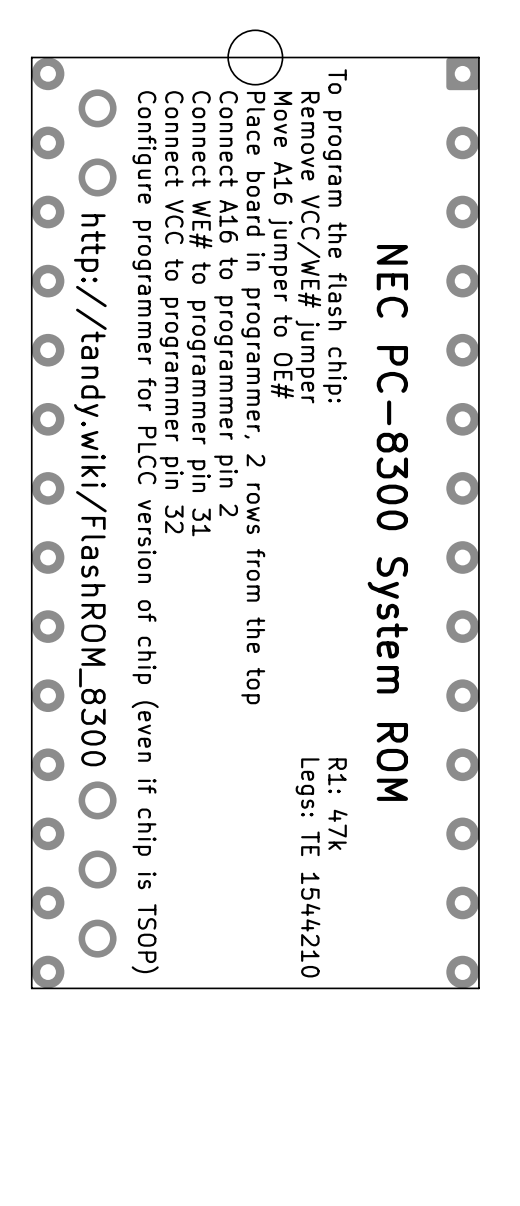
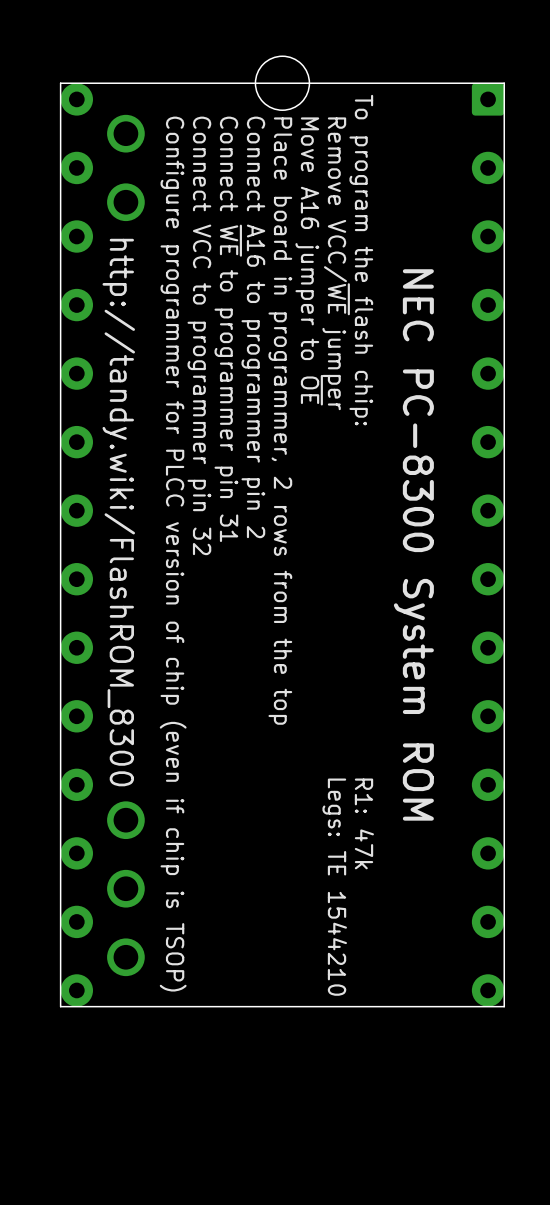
text: Move A16 jumper to OE# (281, 245) -> Move A16 jumper to ~{OE} (309, 261)
text: Remove VCC/WE# jumper (308, 247) -> Remove VCC/~{WE} jumper (336, 263)
text: Connect WE# to programmer pin 31 (199, 313) -> Connect ~{WE} to programmer pin 31 (228, 329)

